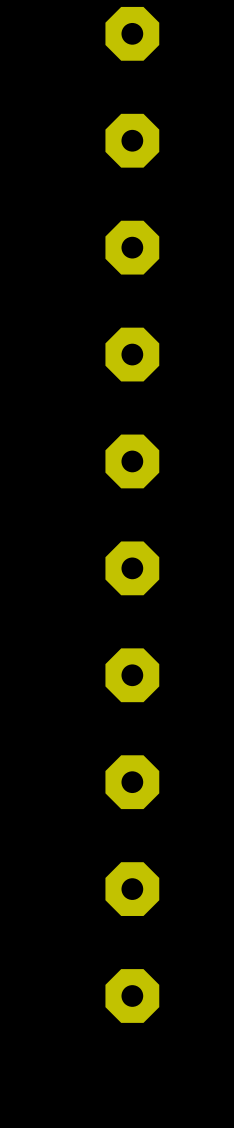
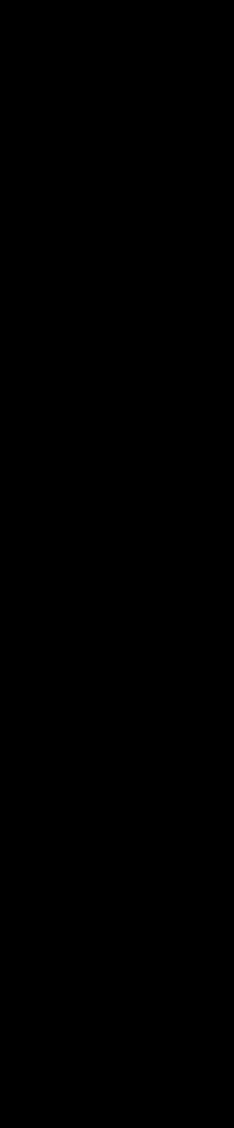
part: (132, 33) -> none
part: (132, 140) -> none
part: (132, 247) -> none
part: (132, 354) -> none
part: (132, 461) -> none
part: (132, 568) -> none
part: (132, 675) -> none
part: (132, 782) -> none
part: (132, 889) -> none
part: (132, 995) -> none

